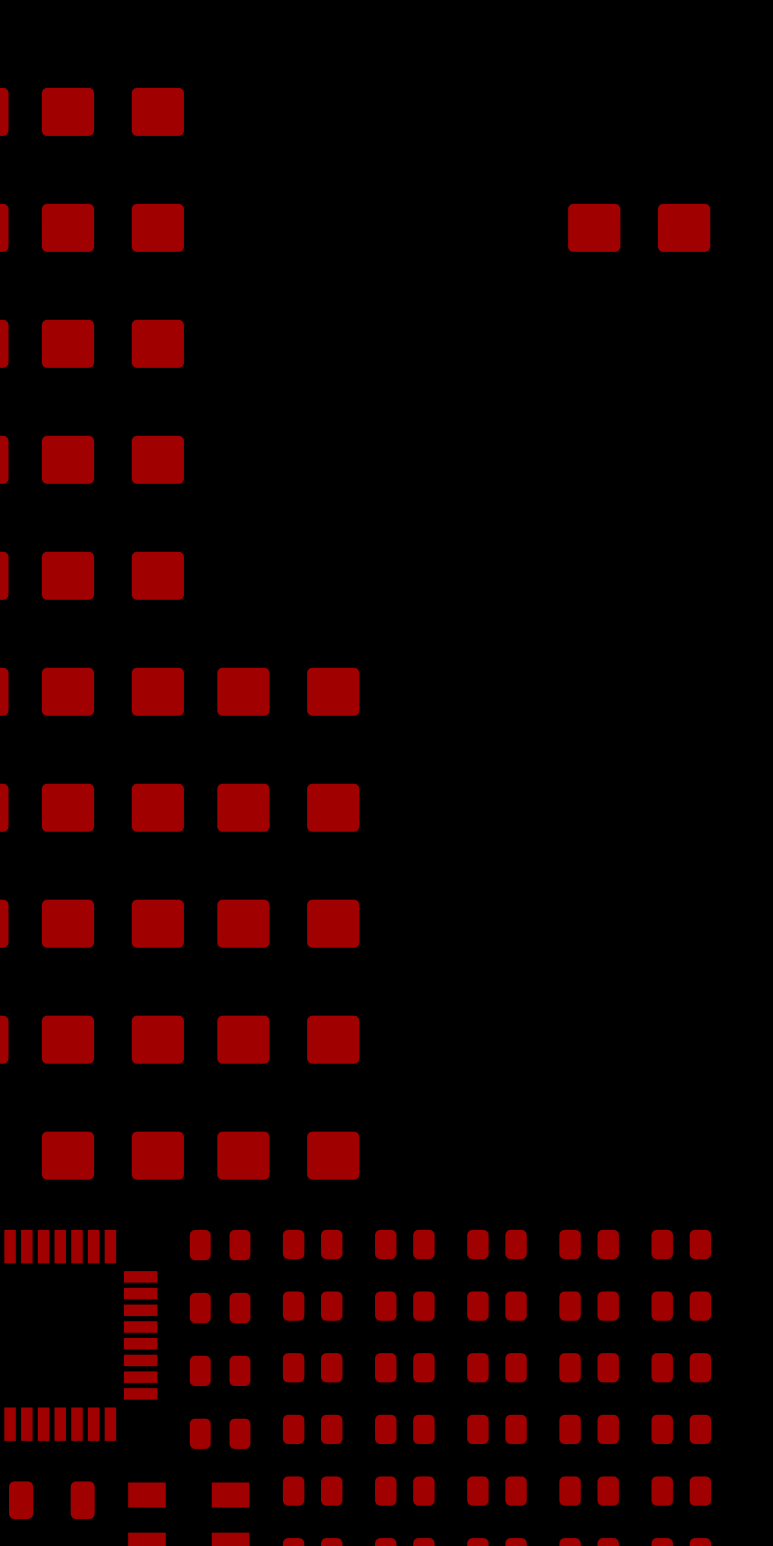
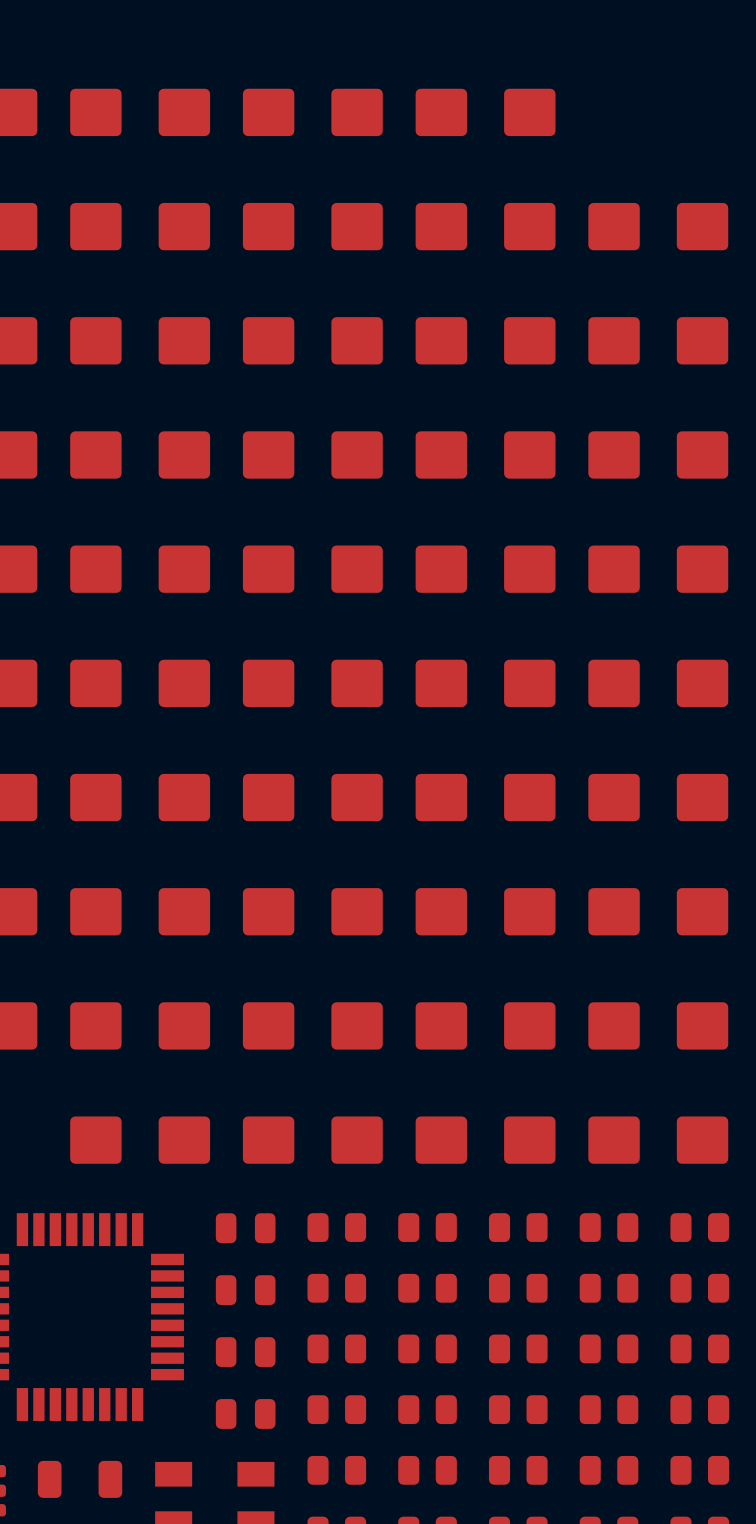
part: none -> (312, 112)
part: none -> (485, 112)
part: none -> (312, 226)
part: none -> (485, 226)
part: none -> (312, 340)
part: none -> (485, 340)
part: none -> (658, 340)
part: none -> (312, 454)
part: none -> (485, 454)
part: none -> (658, 454)
part: none -> (312, 569)
part: none -> (485, 569)
part: none -> (658, 569)
part: none -> (485, 683)
part: none -> (658, 683)
part: none -> (485, 797)
part: none -> (658, 797)
part: none -> (485, 911)
part: none -> (658, 911)
part: none -> (485, 1025)
part: none -> (658, 1025)
part: none -> (485, 1140)
part: none -> (658, 1140)

